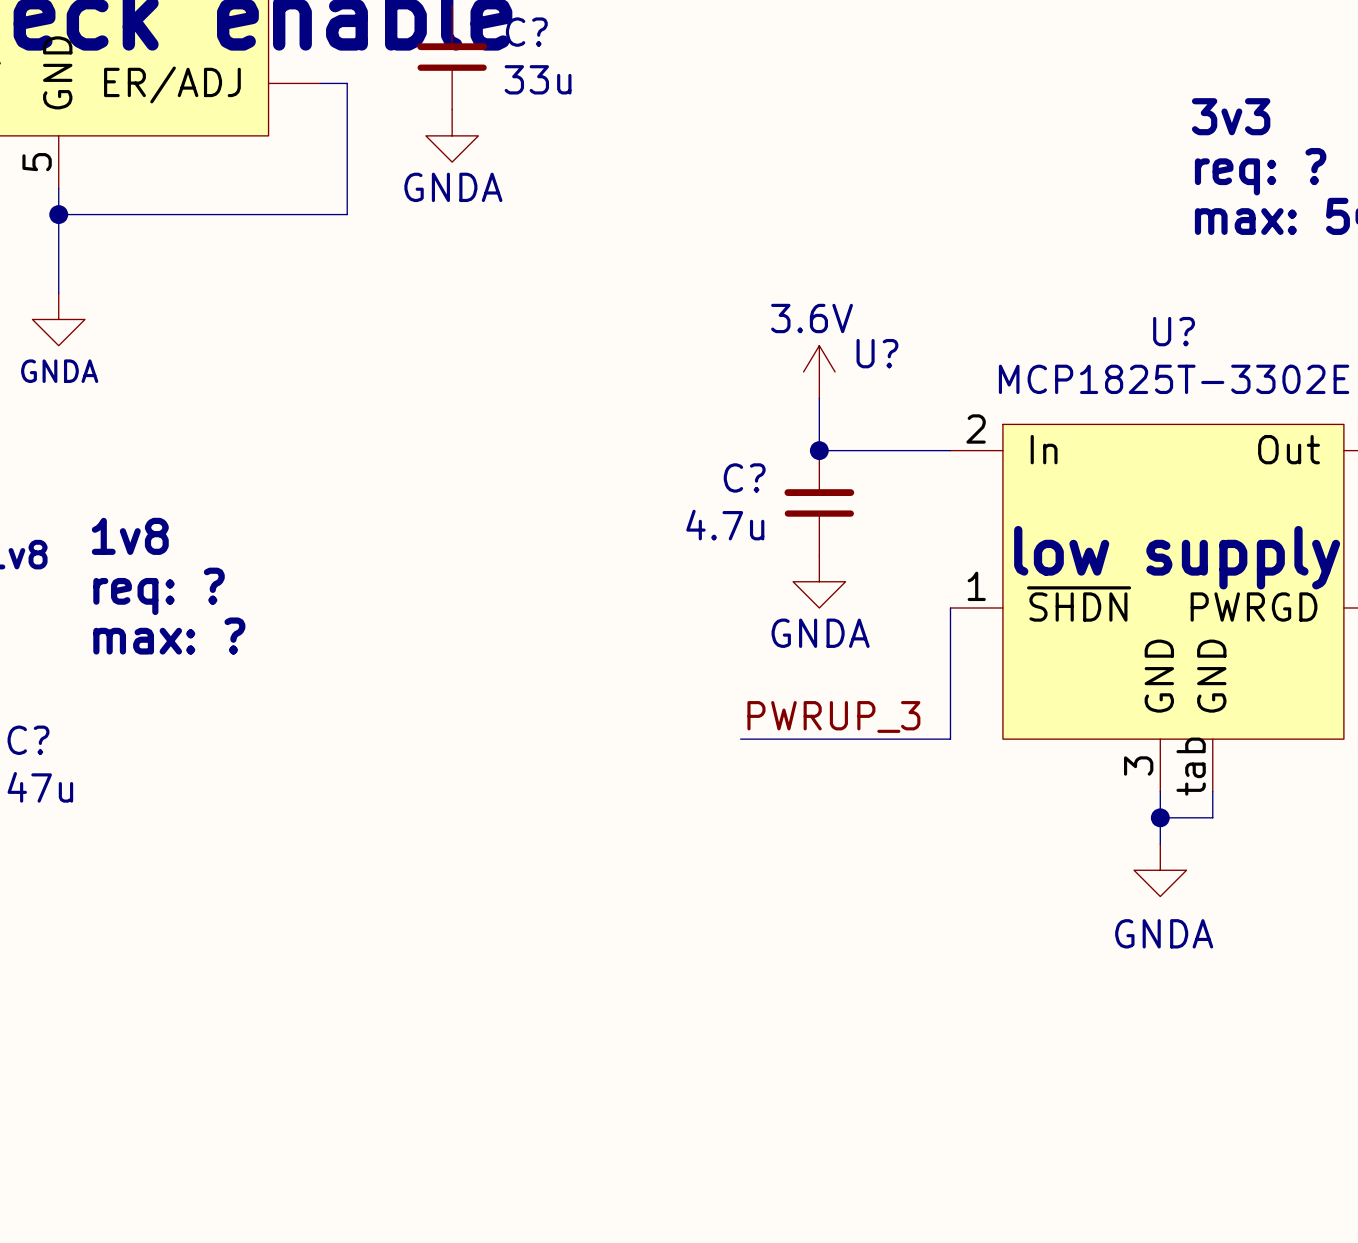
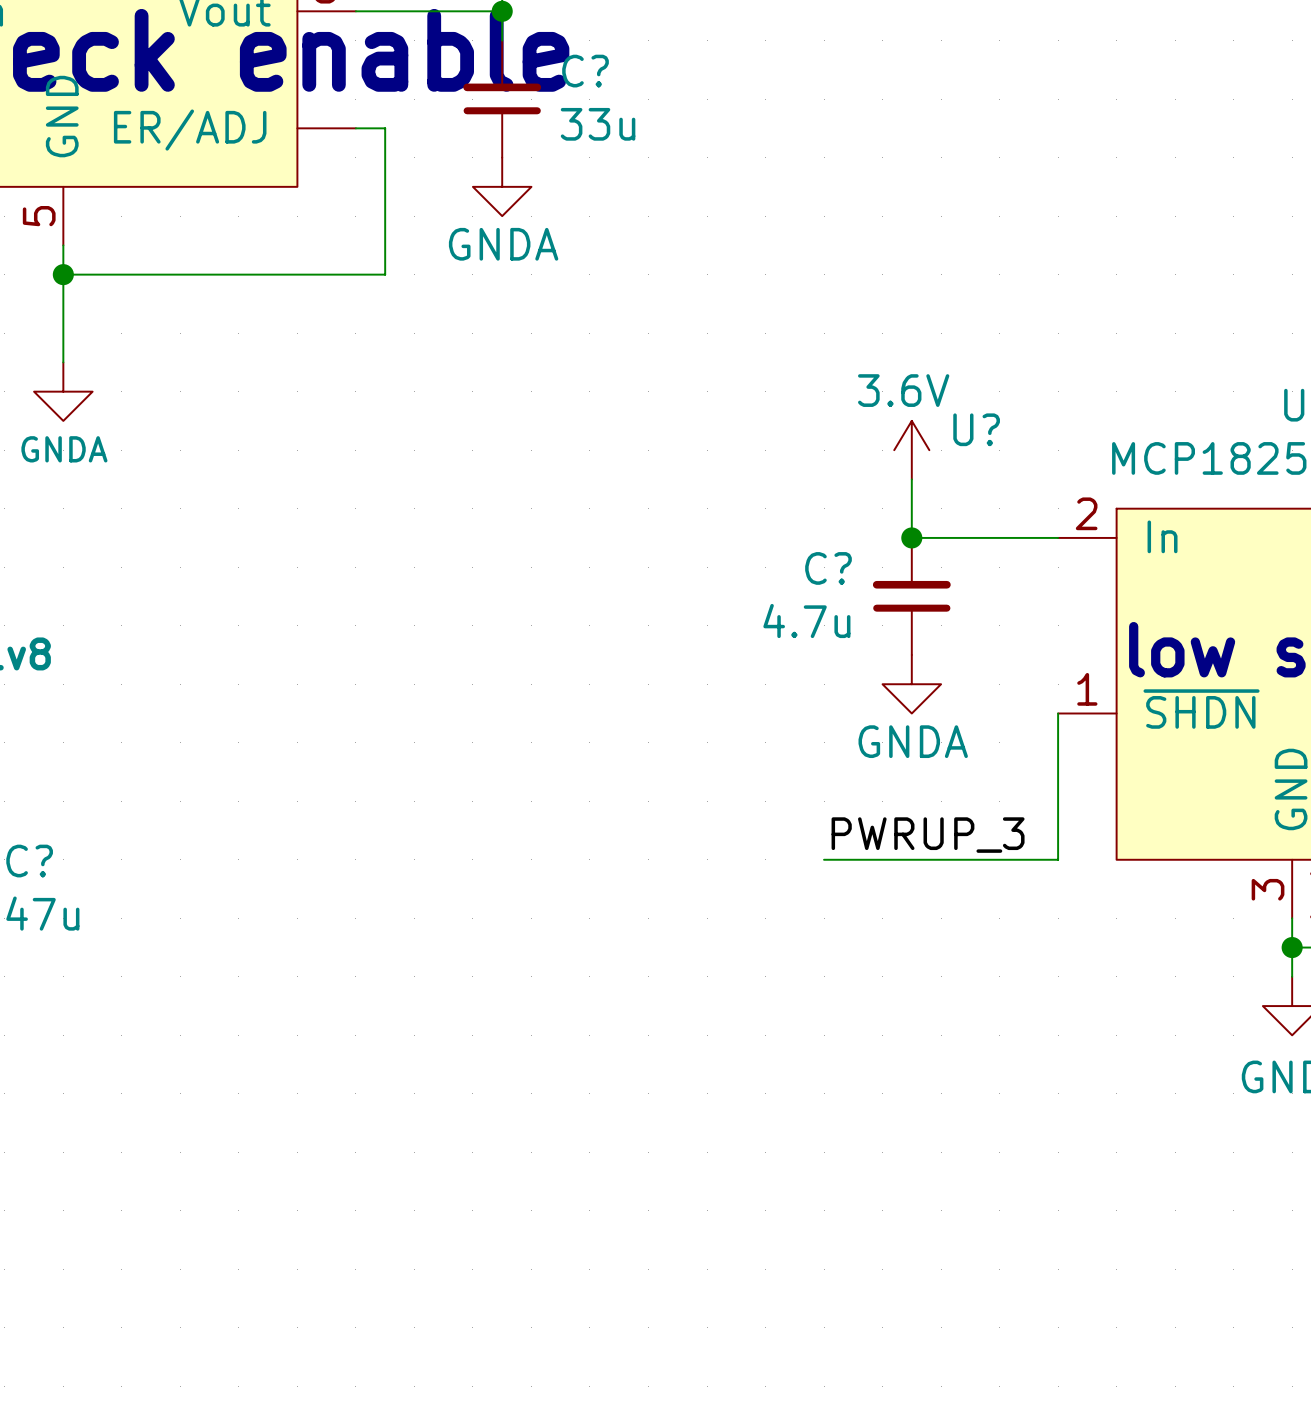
text: 1v8 (130, 536) -> none
text: req: ? (159, 591) -> none
text: max: ? (169, 636) -> none

